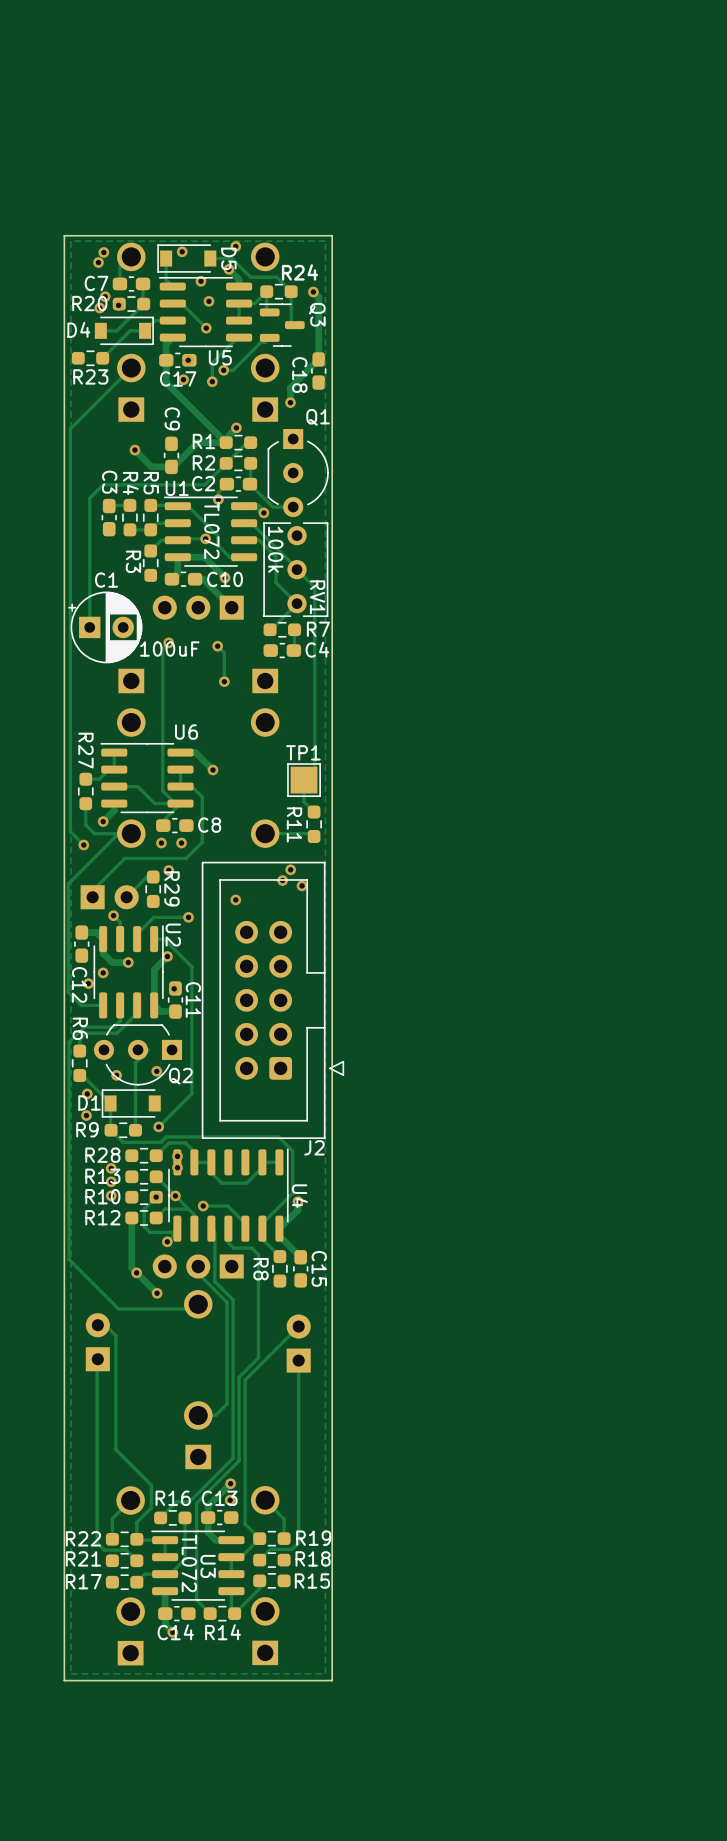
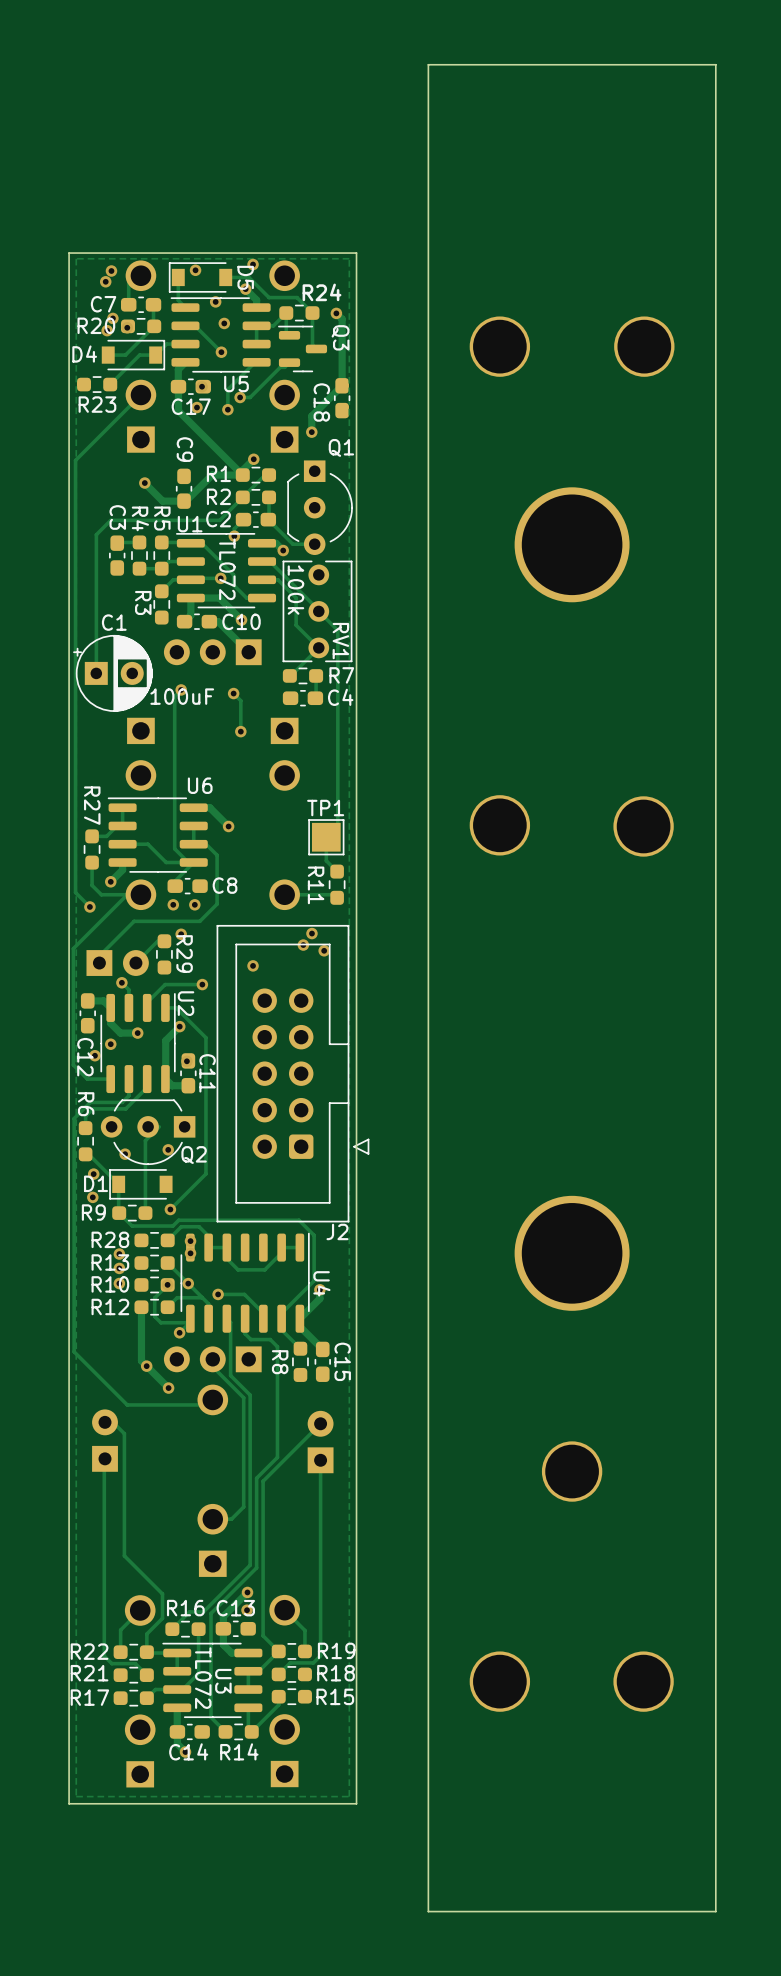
board edge: none -> (715, 64) (715, 1911) (428, 1911) (428, 64) (715, 64)
part: none -> (499, 346)
part: none -> (644, 346)
part: none -> (572, 544)
part: none -> (499, 825)
part: none -> (643, 826)
part: none -> (572, 1253)
part: none -> (572, 1471)
part: none -> (499, 1681)
part: none -> (643, 1681)

